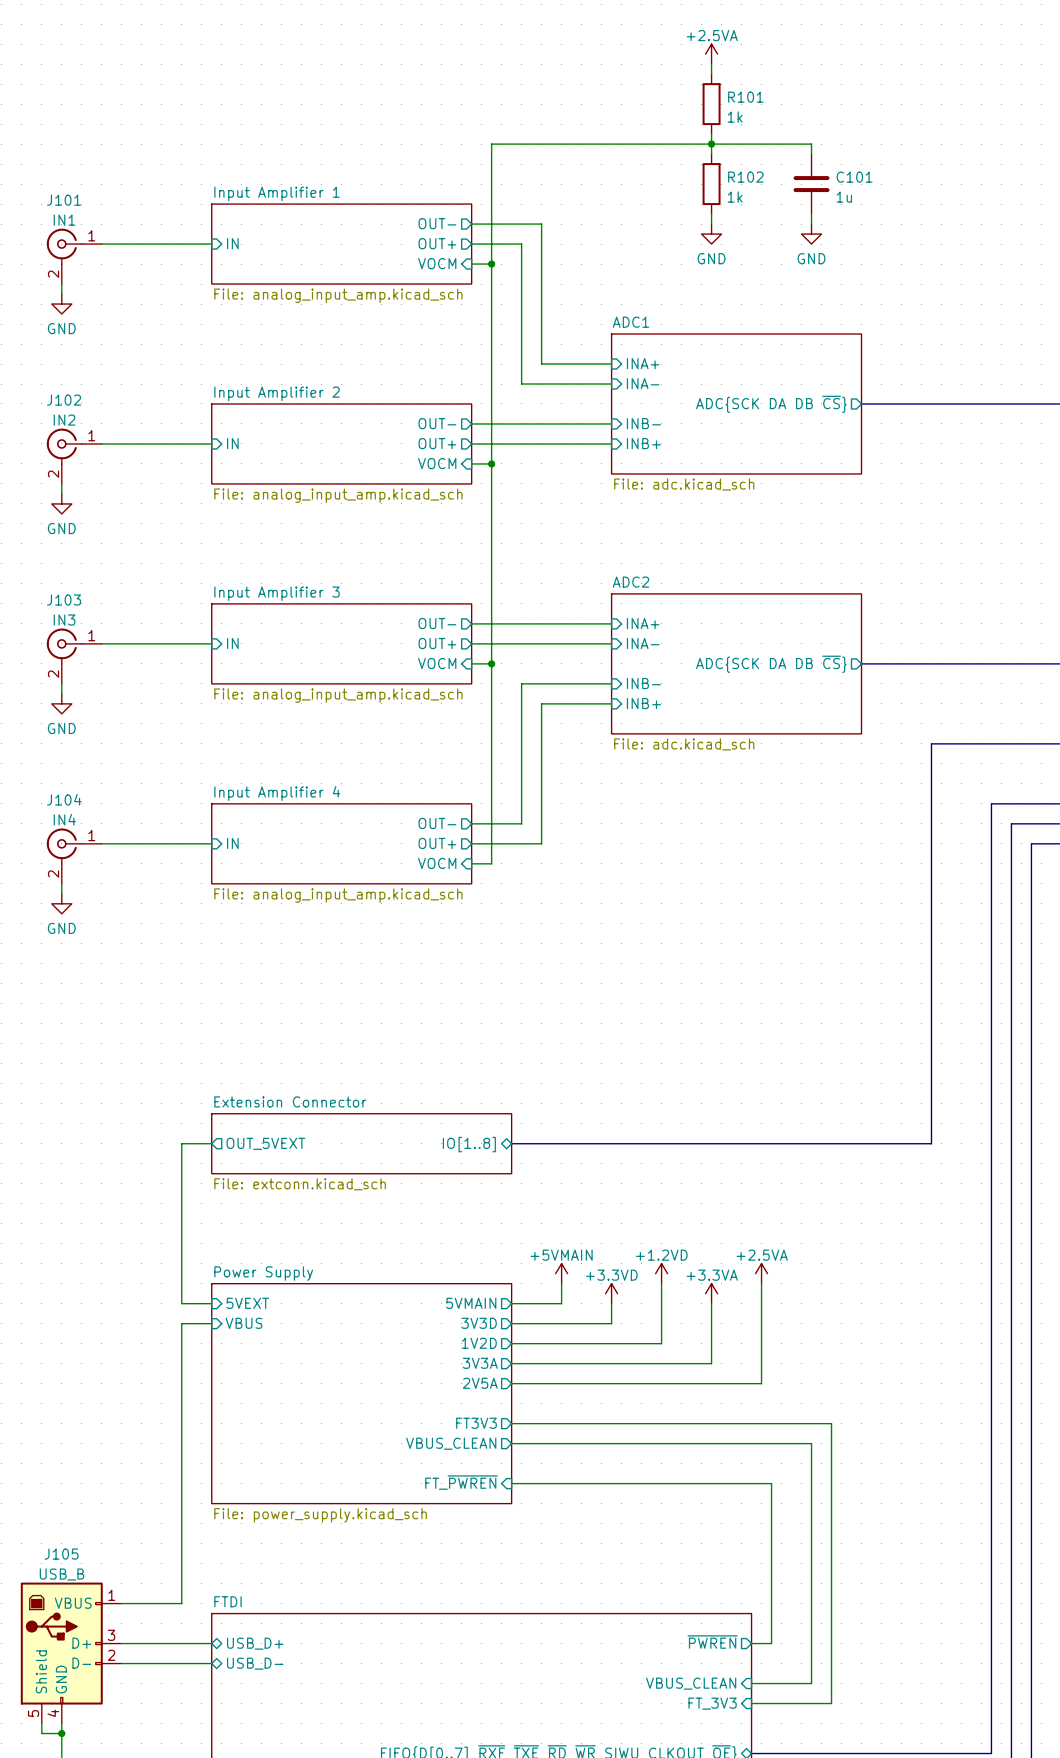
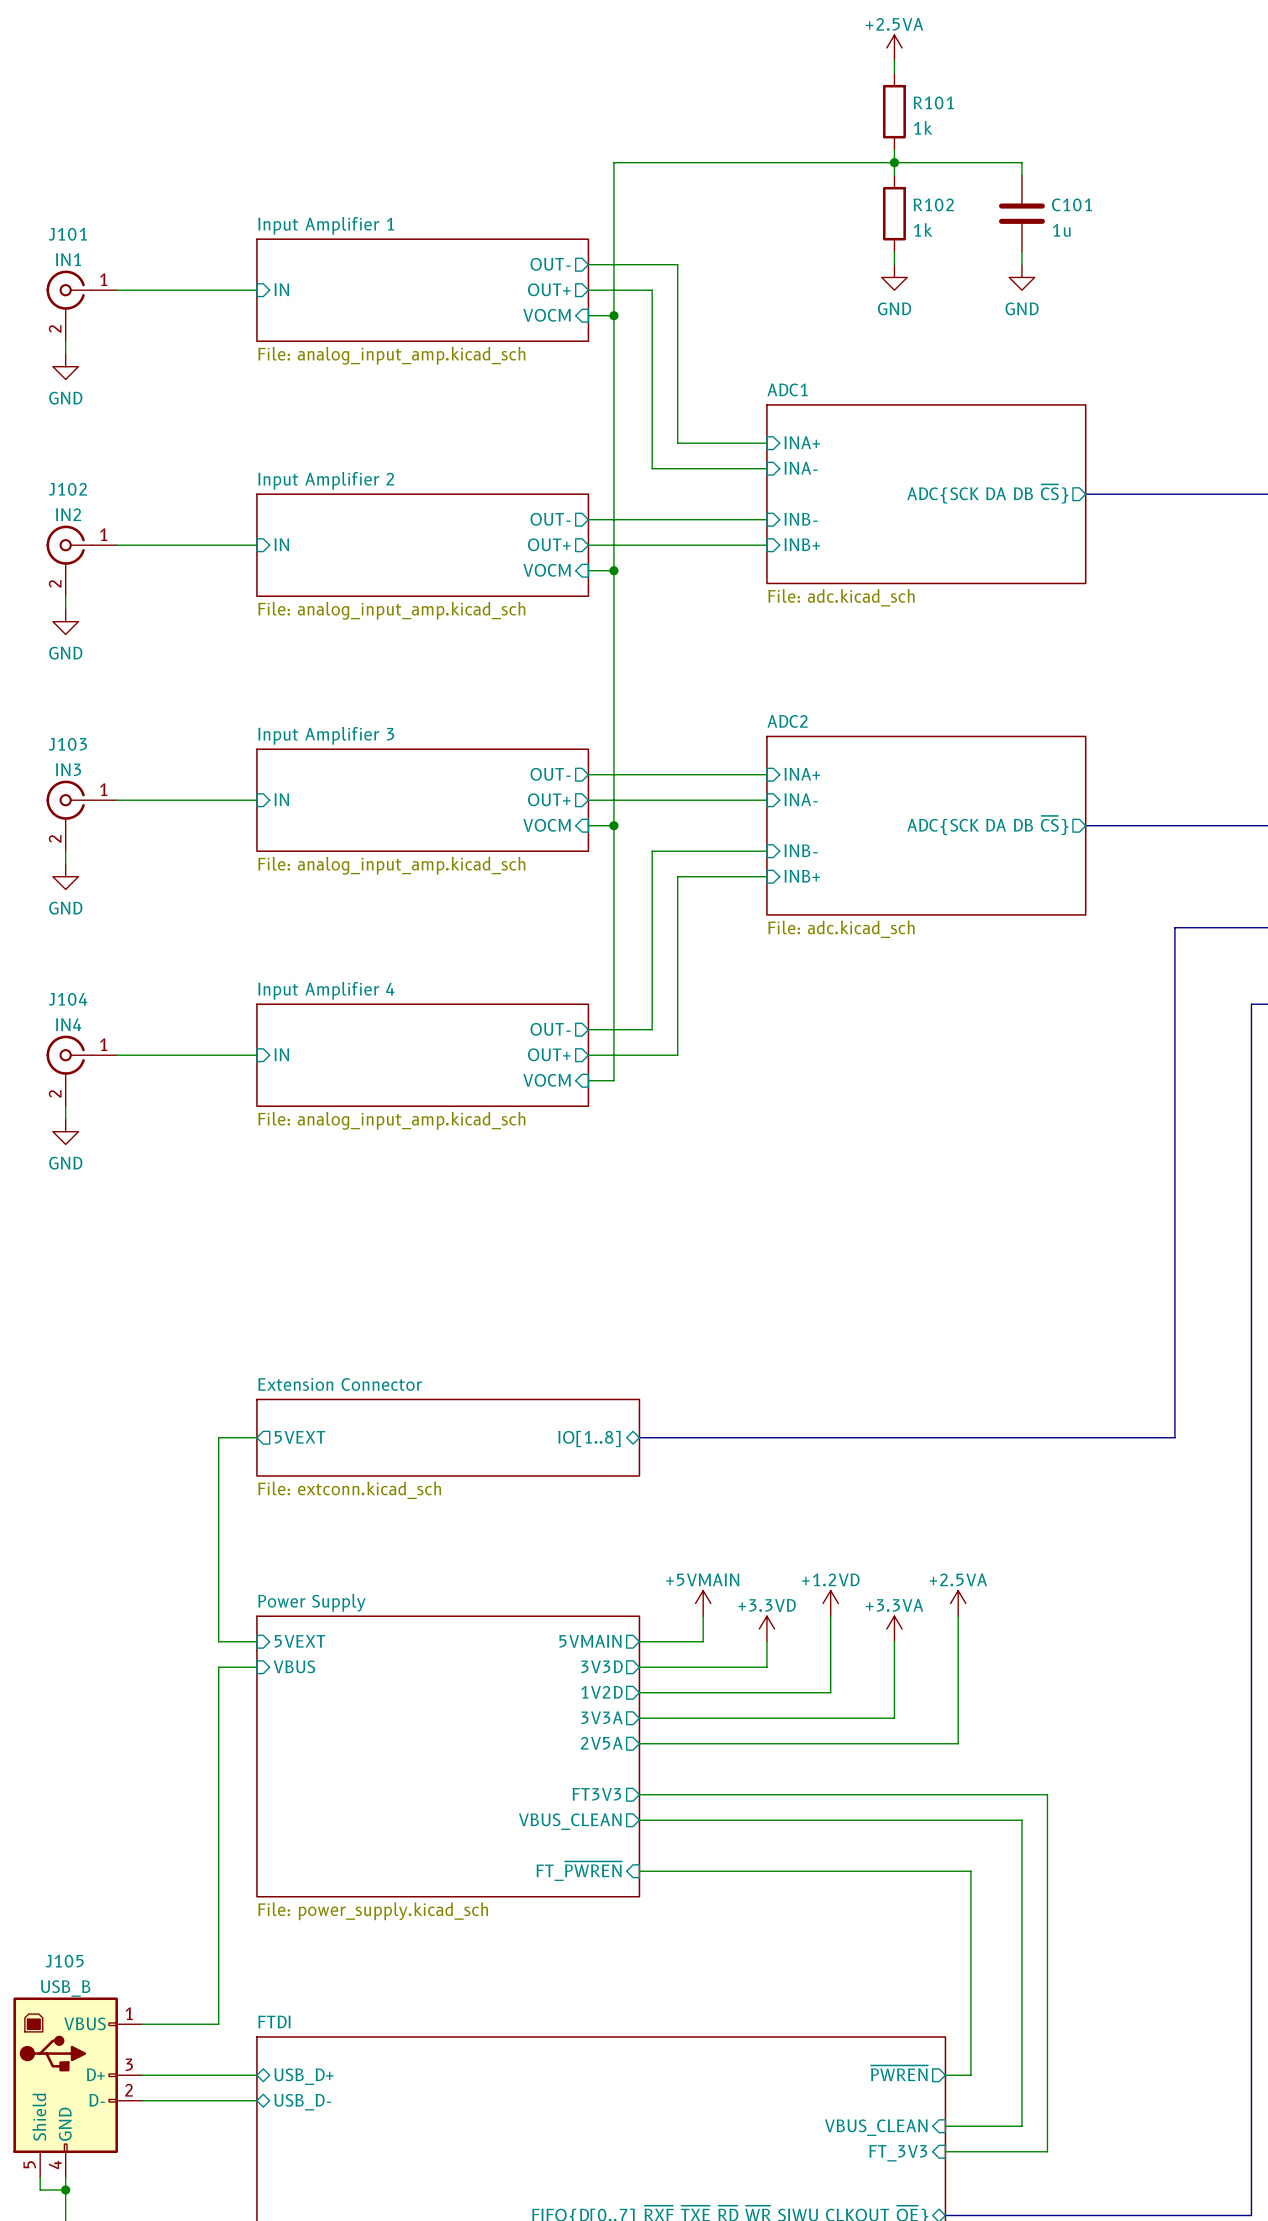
sheet pin: OUT_5VEXT (265, 1143) -> 5VEXT (300, 1437)

